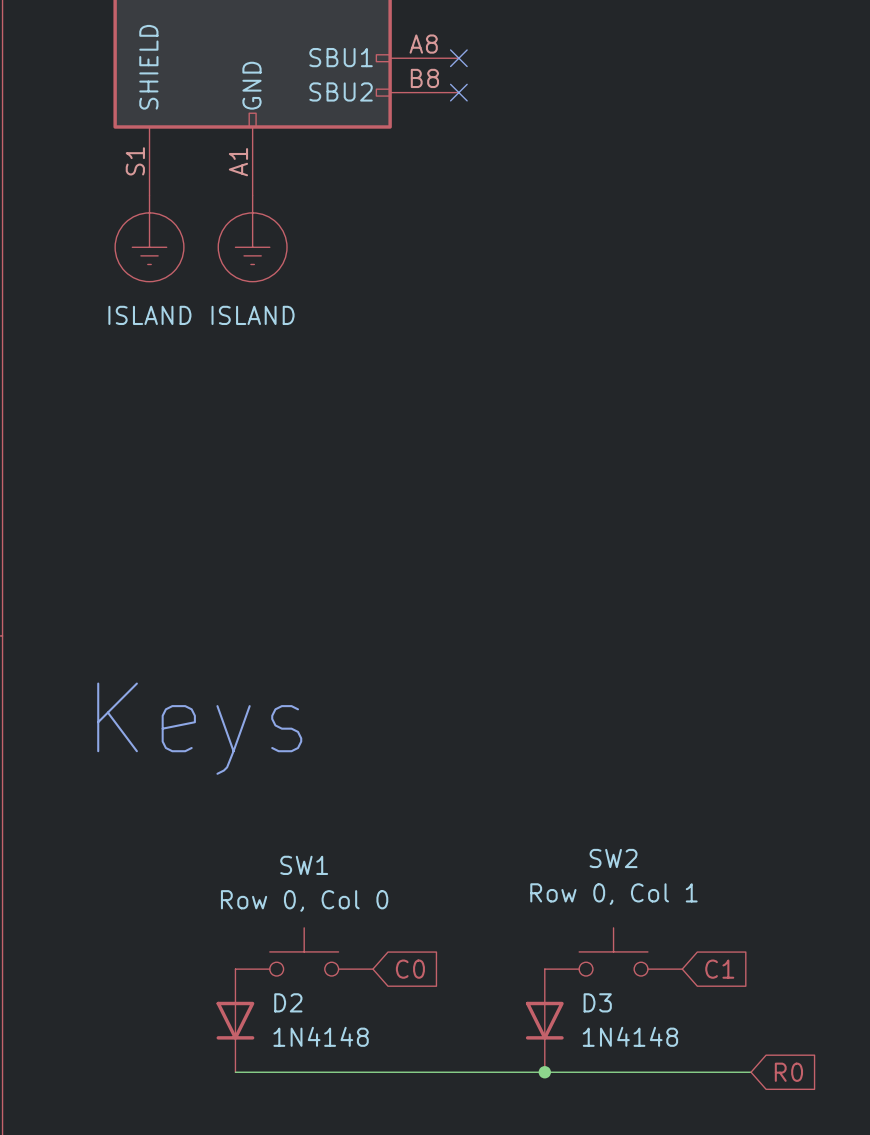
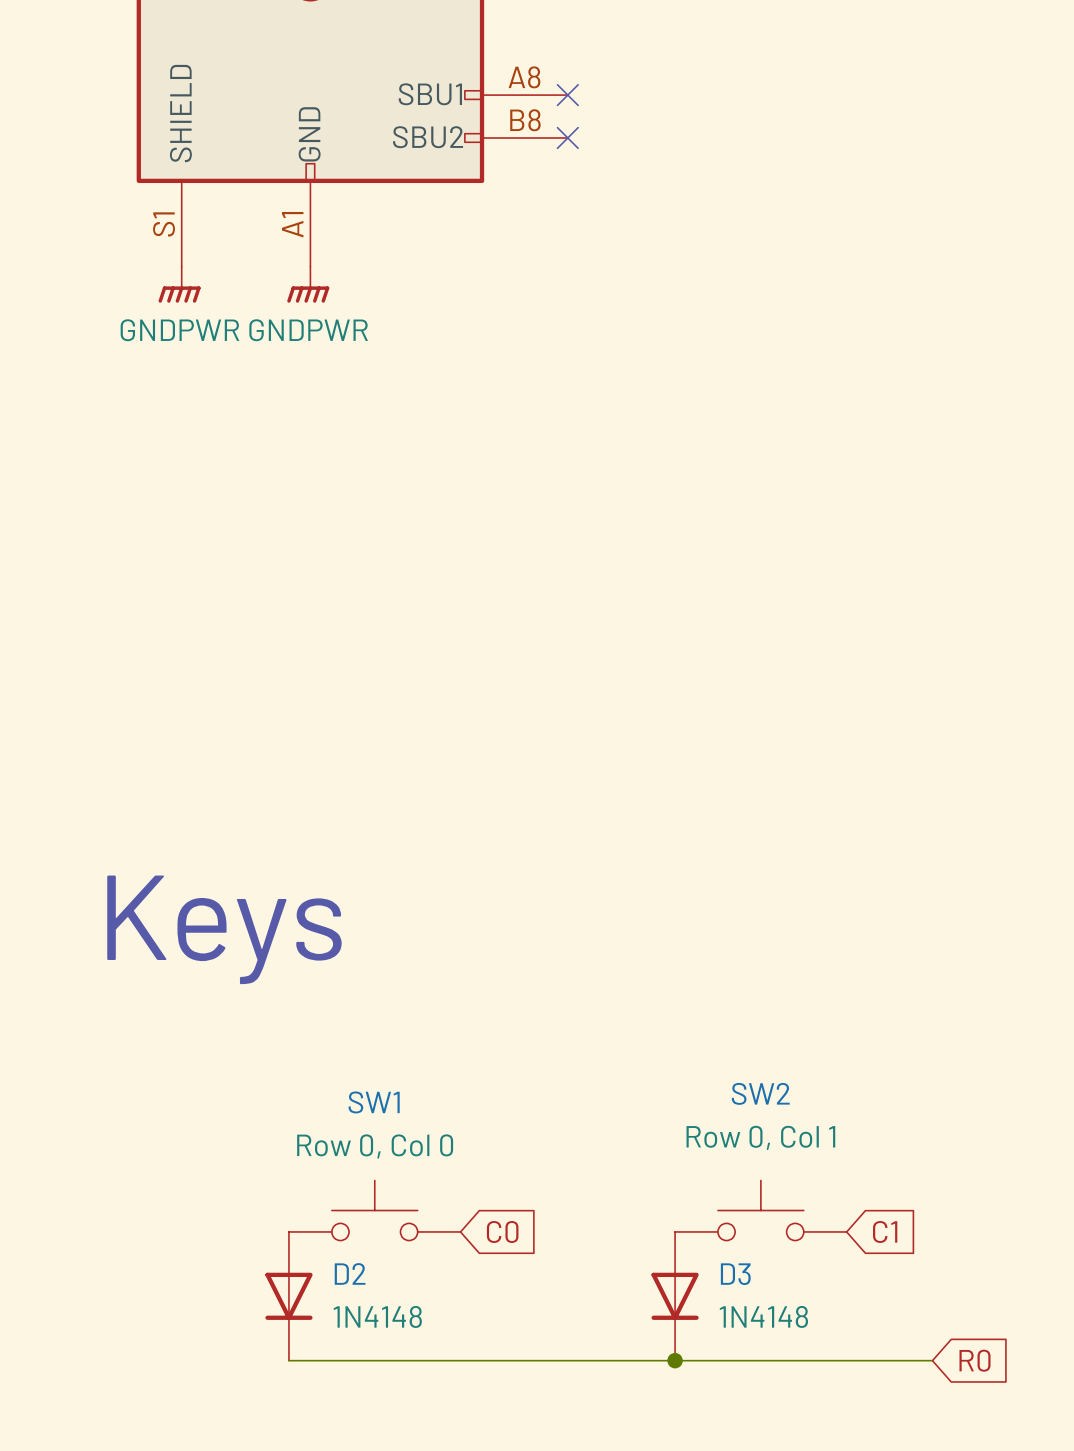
power symbol: none -> GNDPWR (179, 284)
power symbol: none -> GNDPWR (308, 284)
power symbol: ISLAND (149, 238) -> none
power symbol: ISLAND (252, 238) -> none

